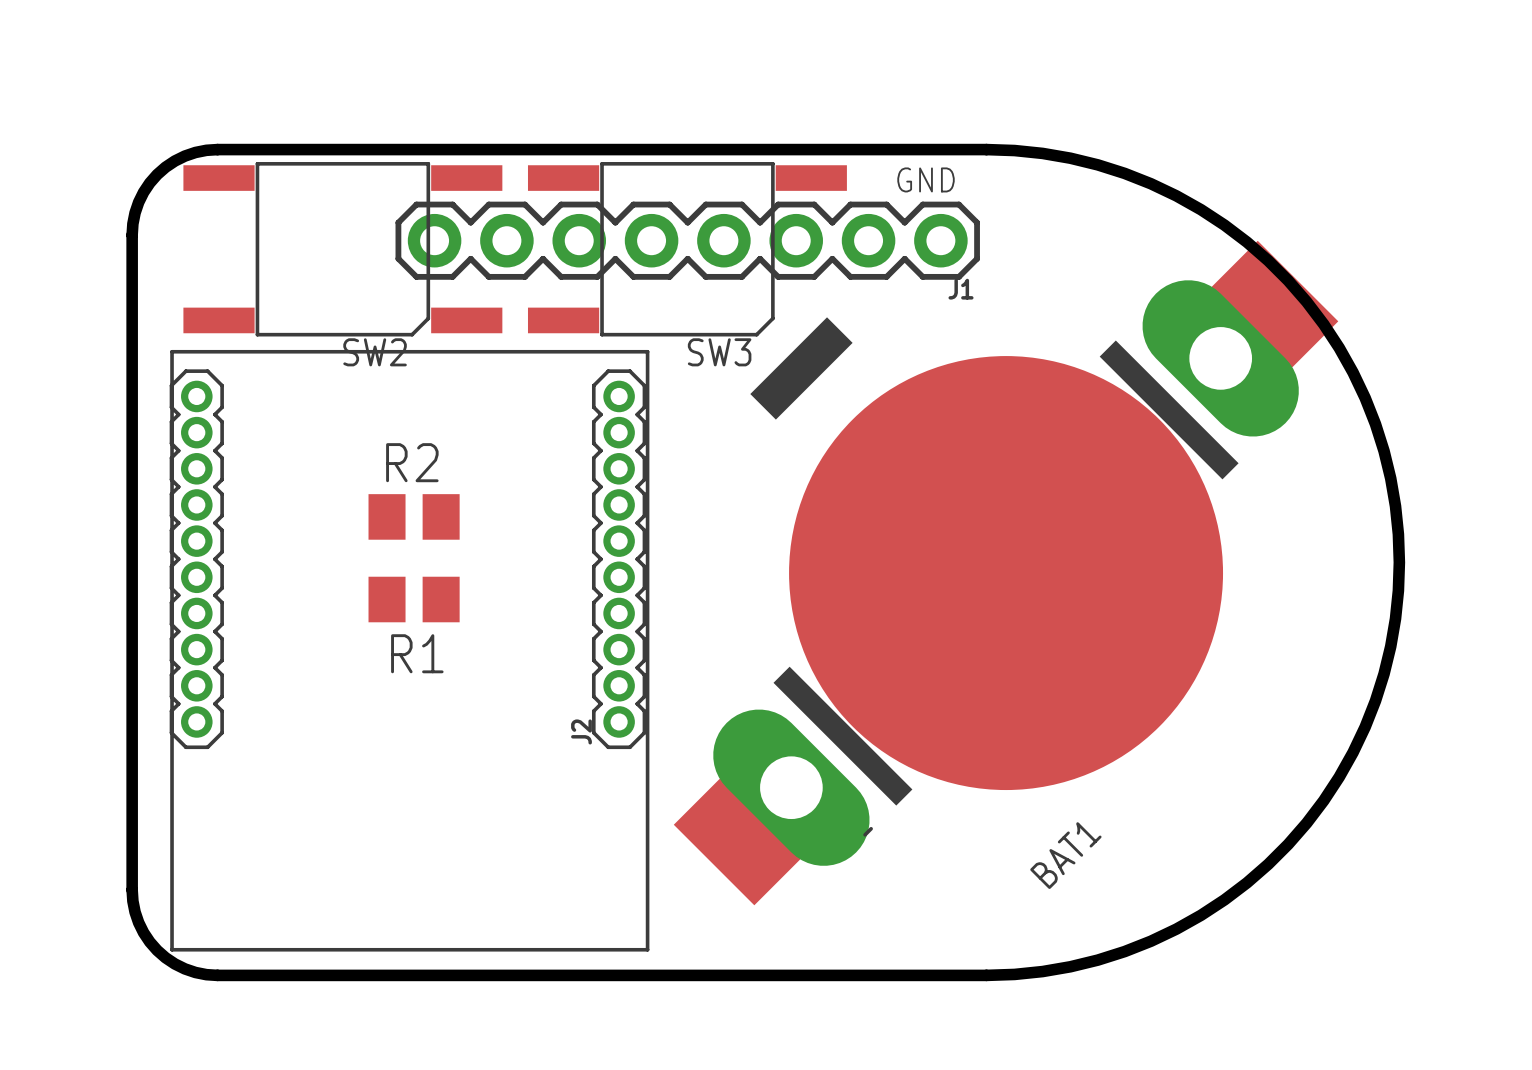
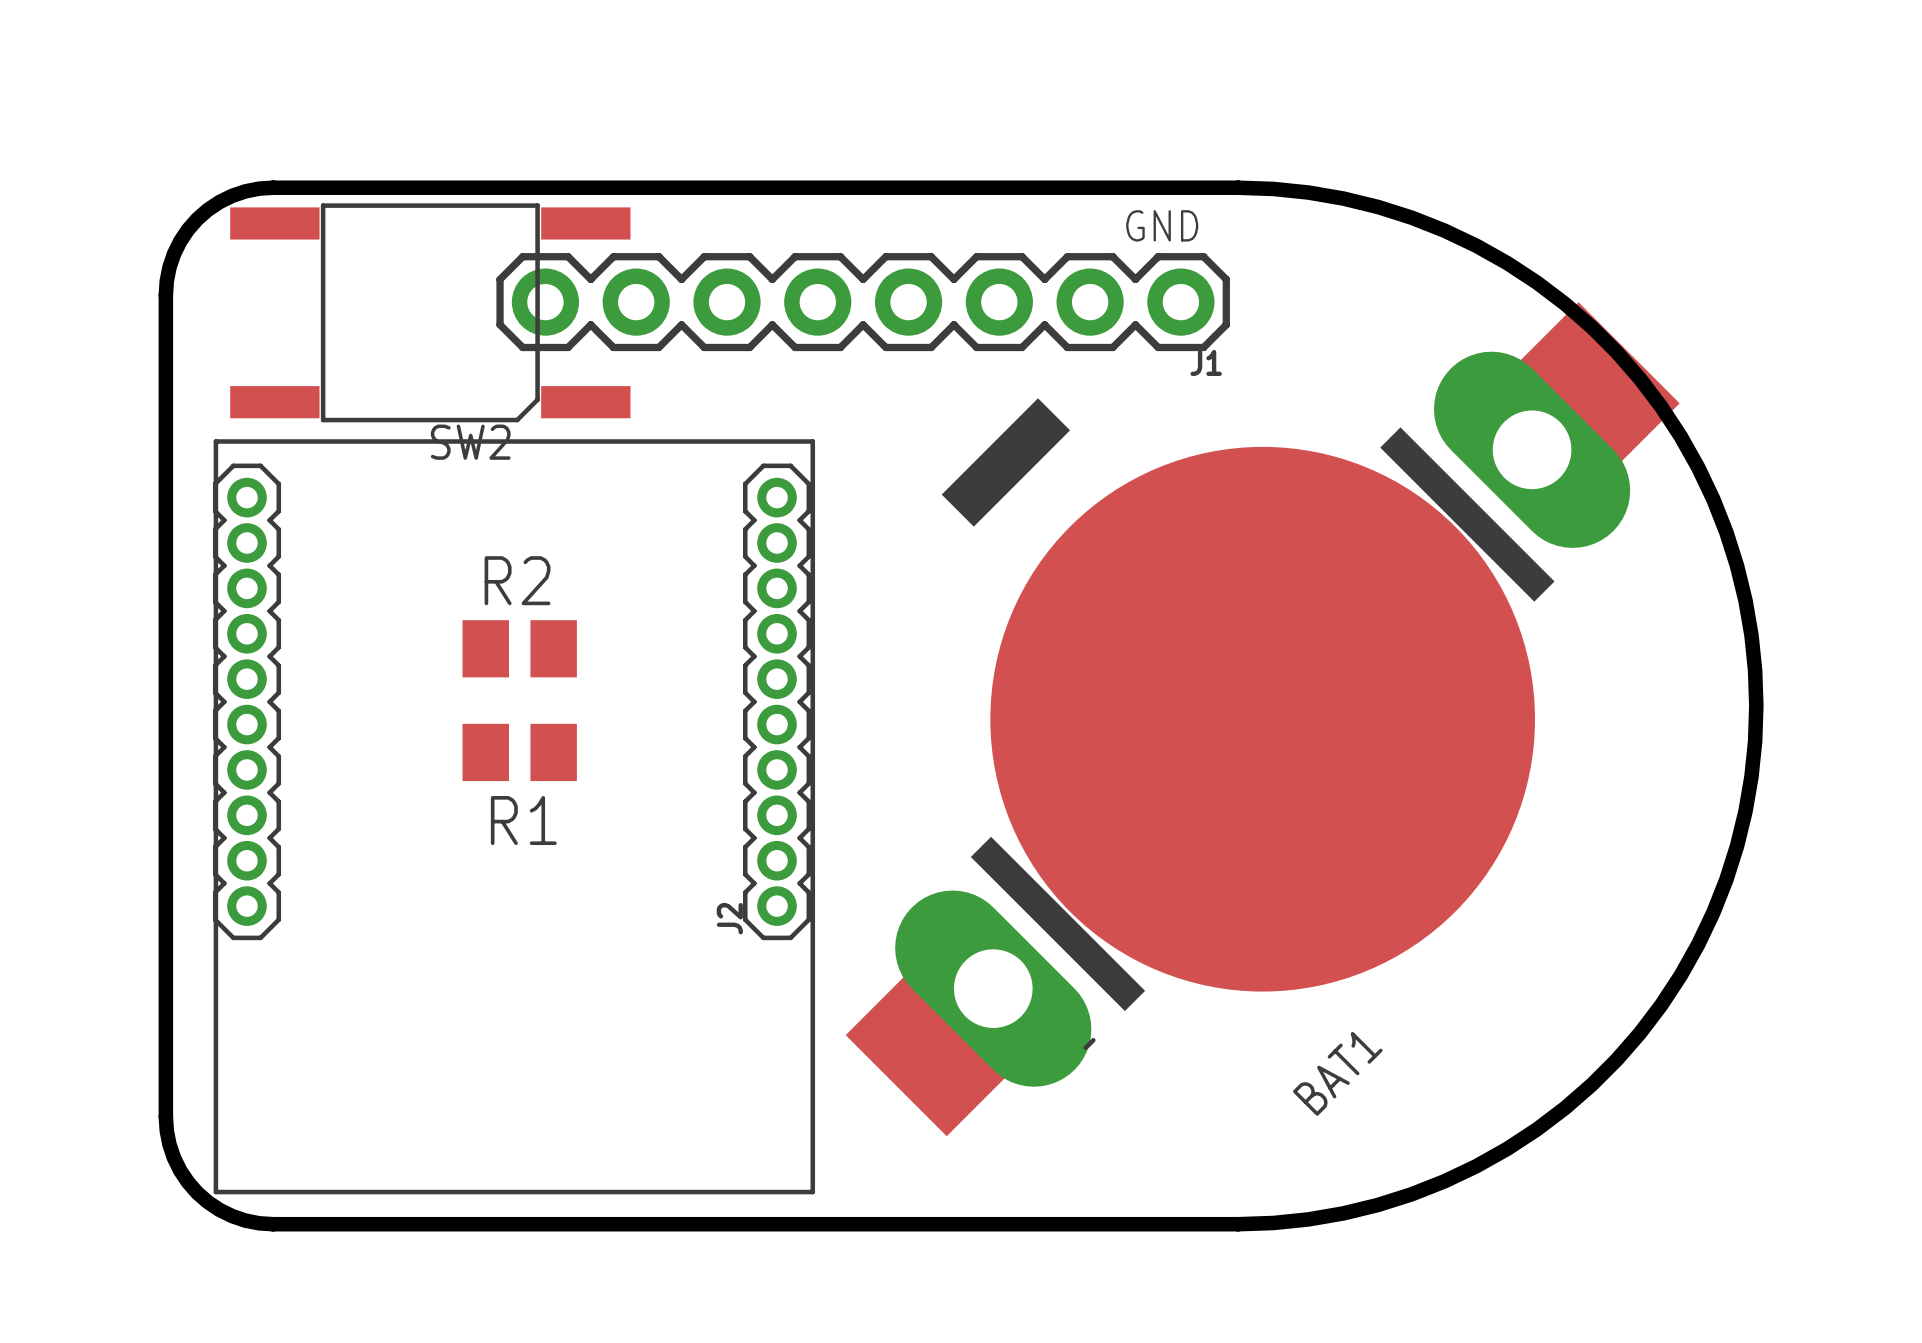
SW3: (687, 249) -> none

